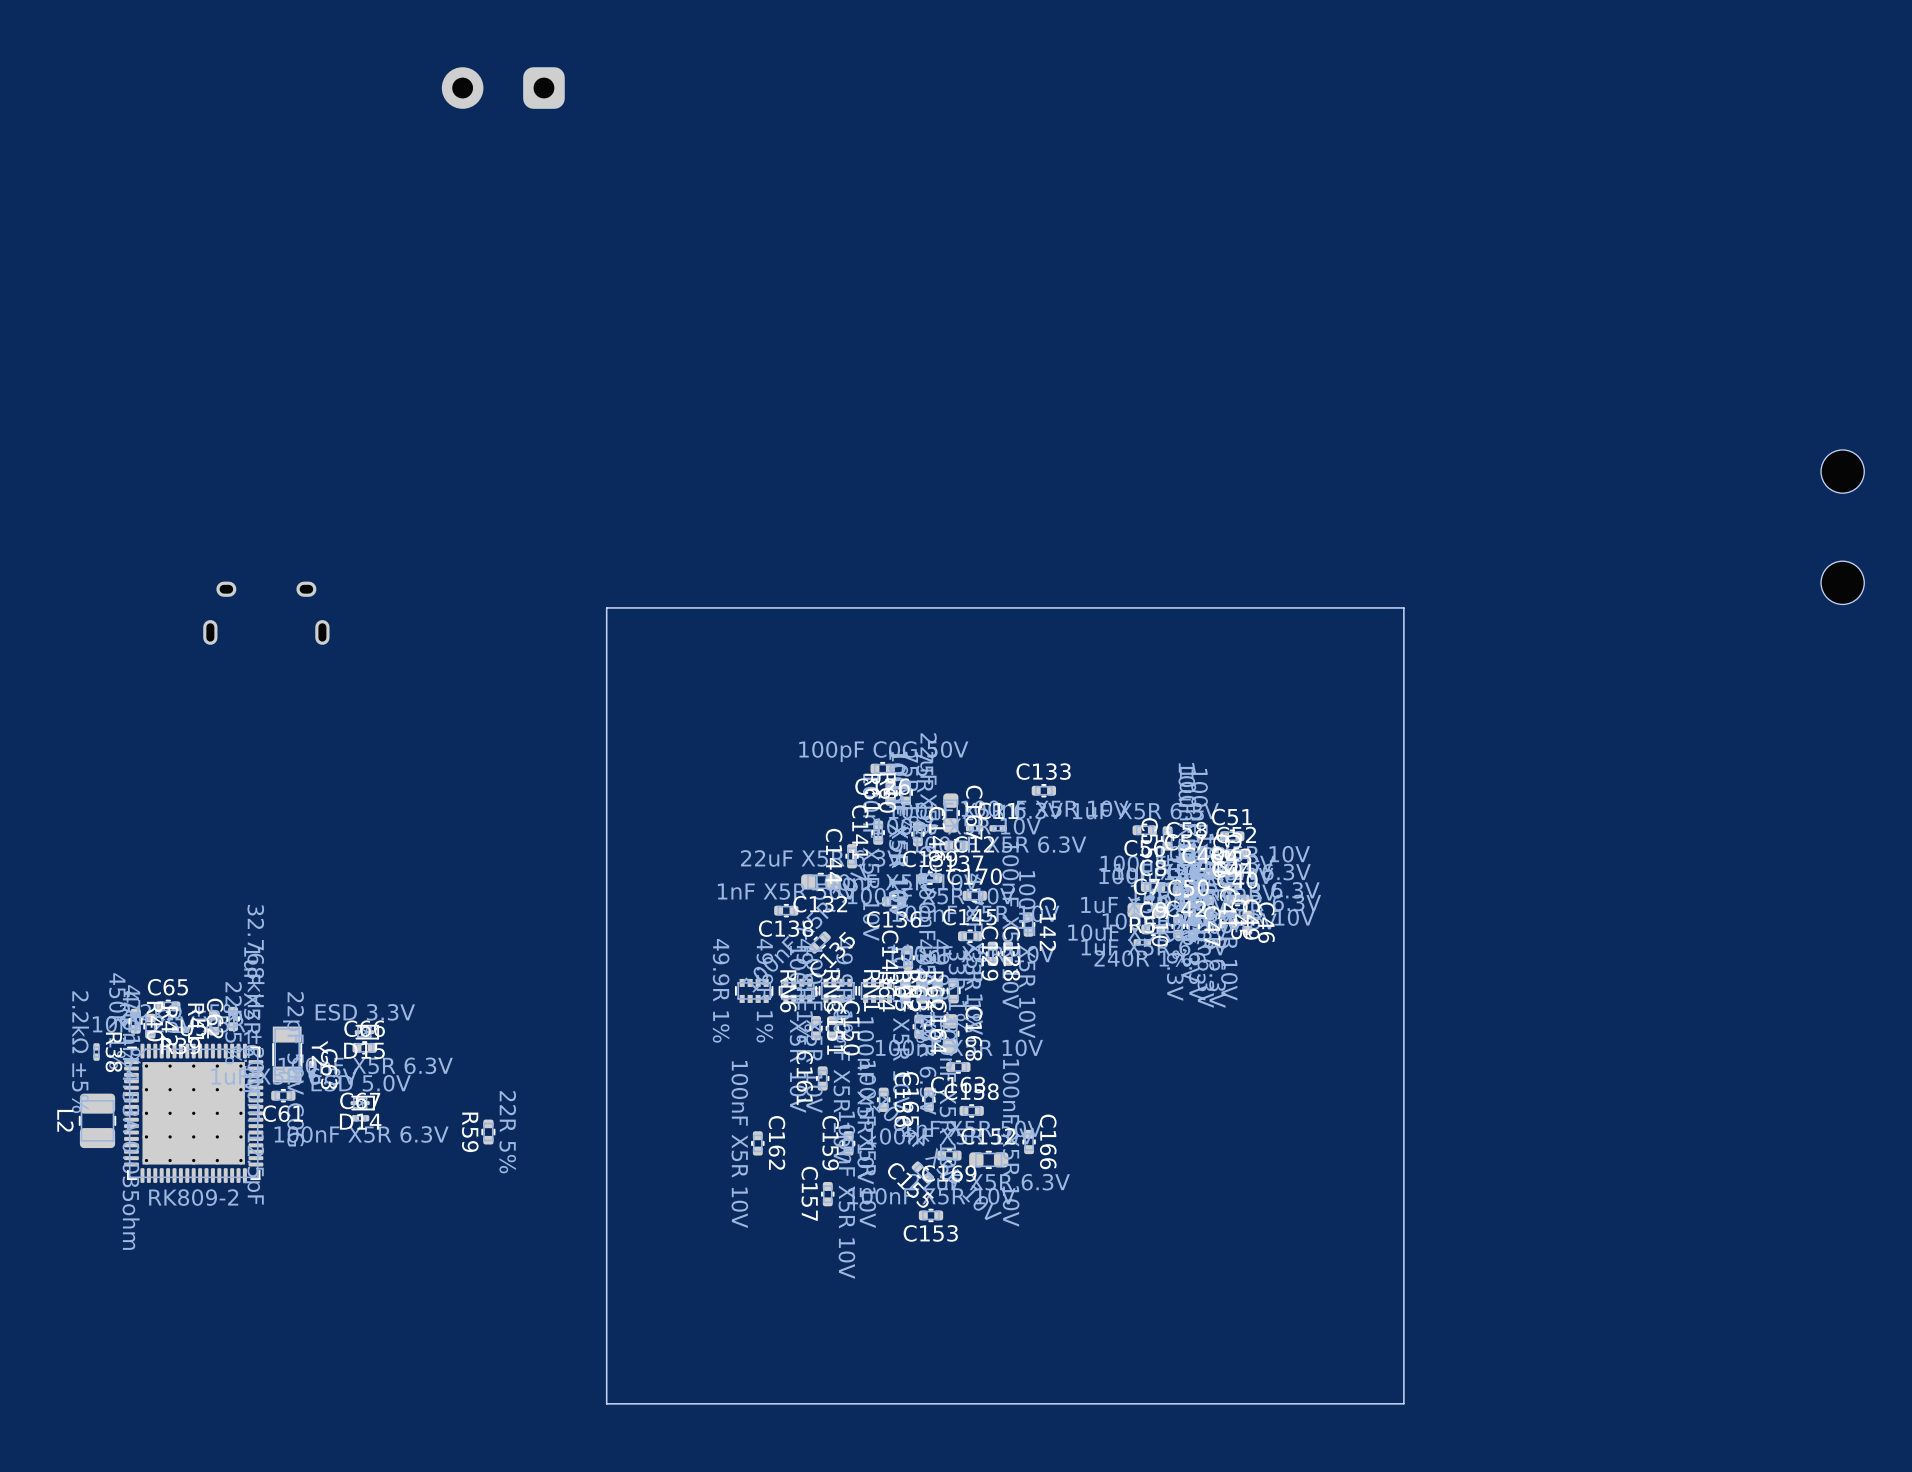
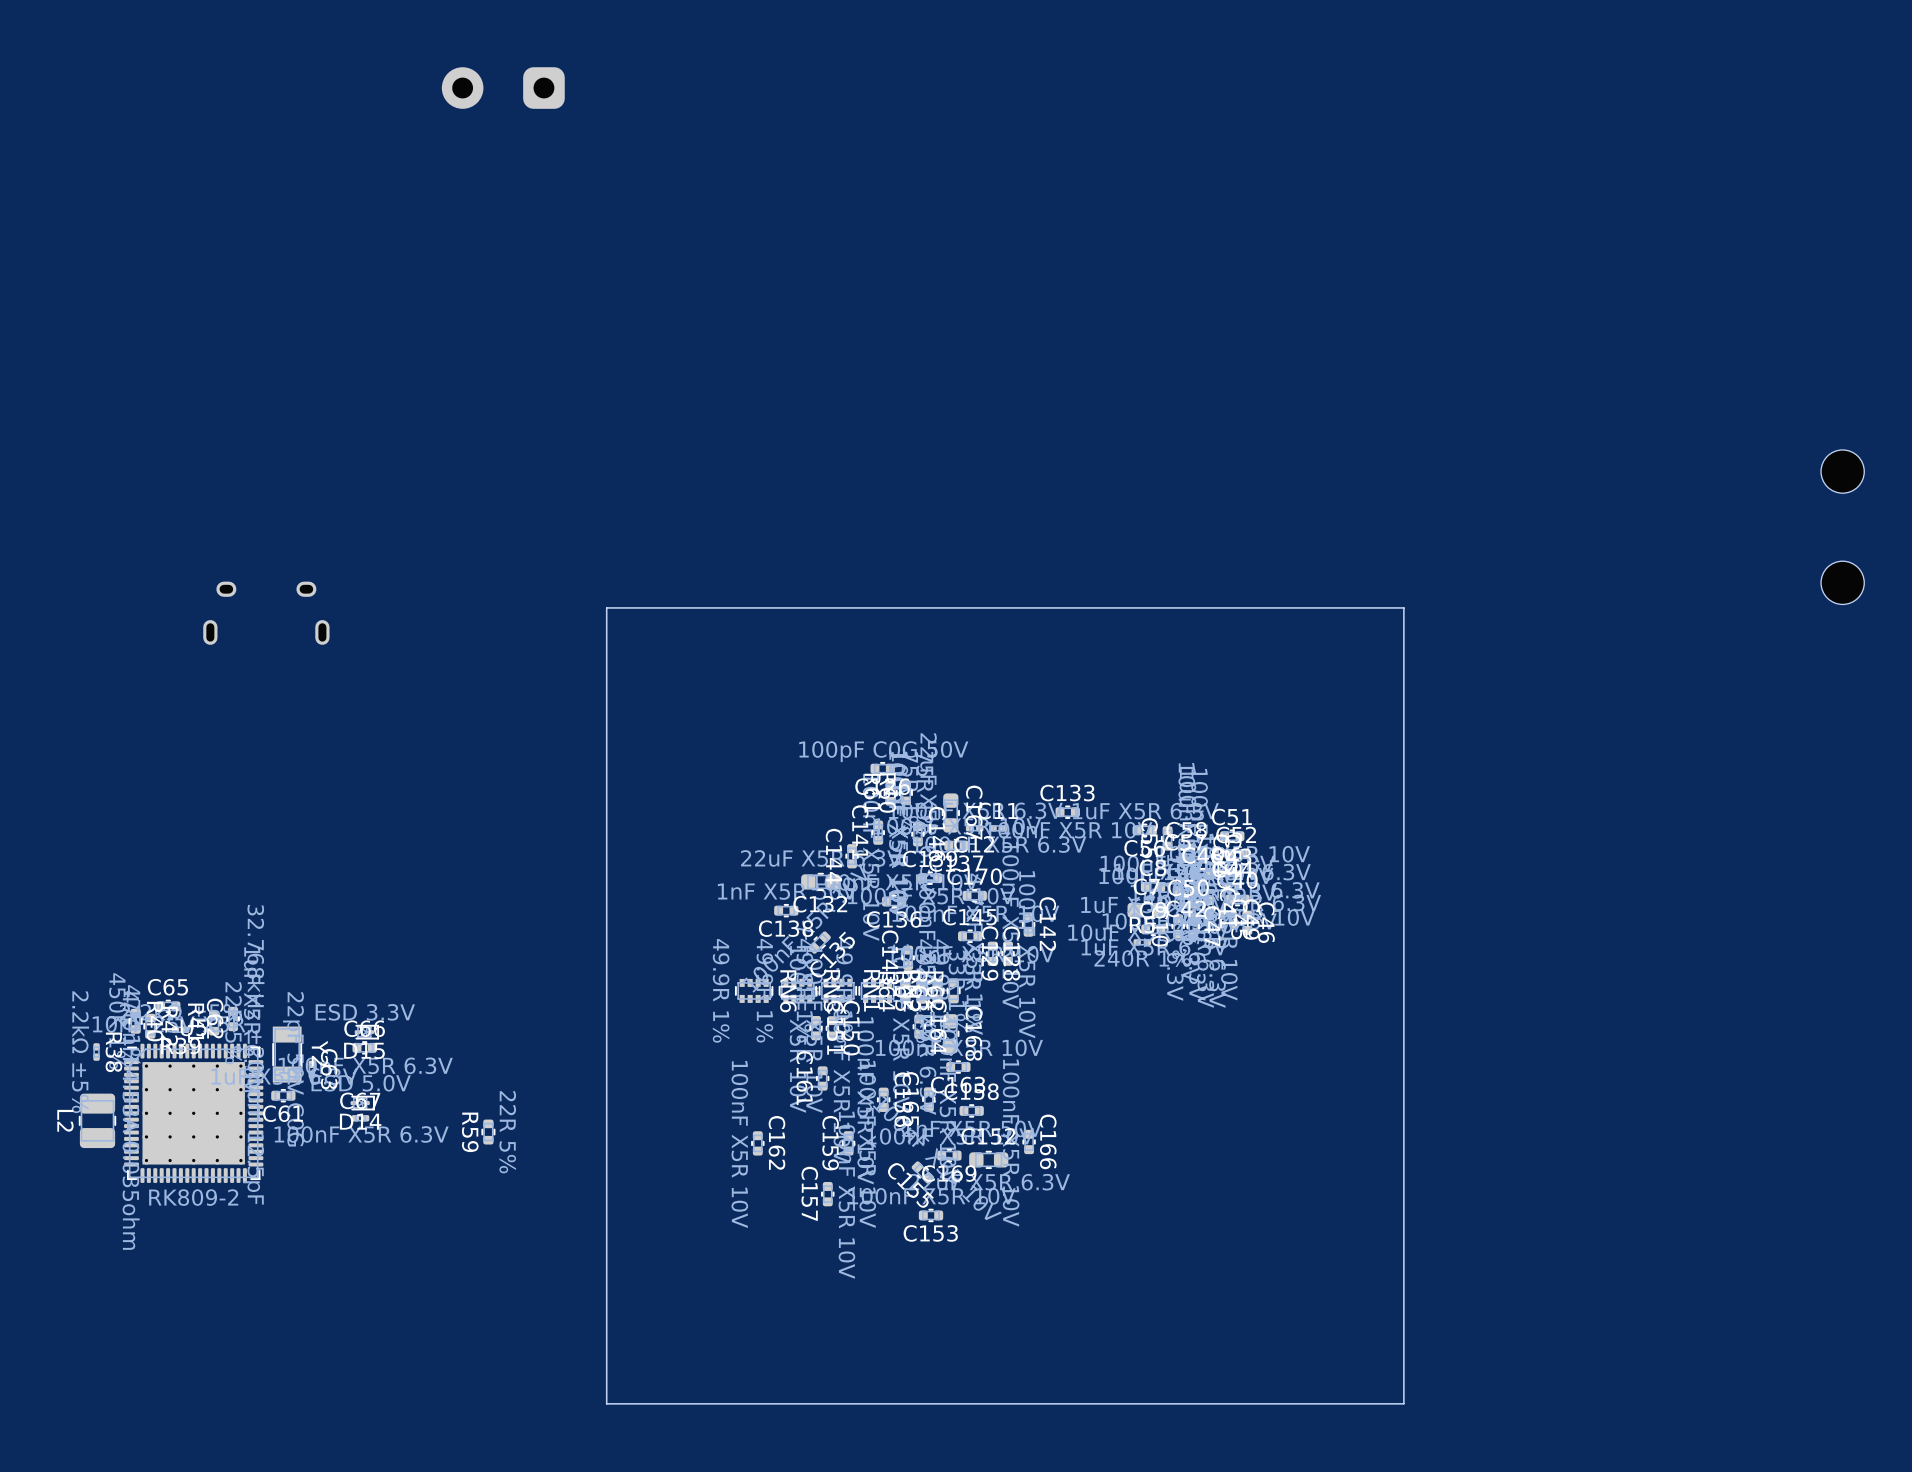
C133 position: (1043, 790) -> (1067, 812)

